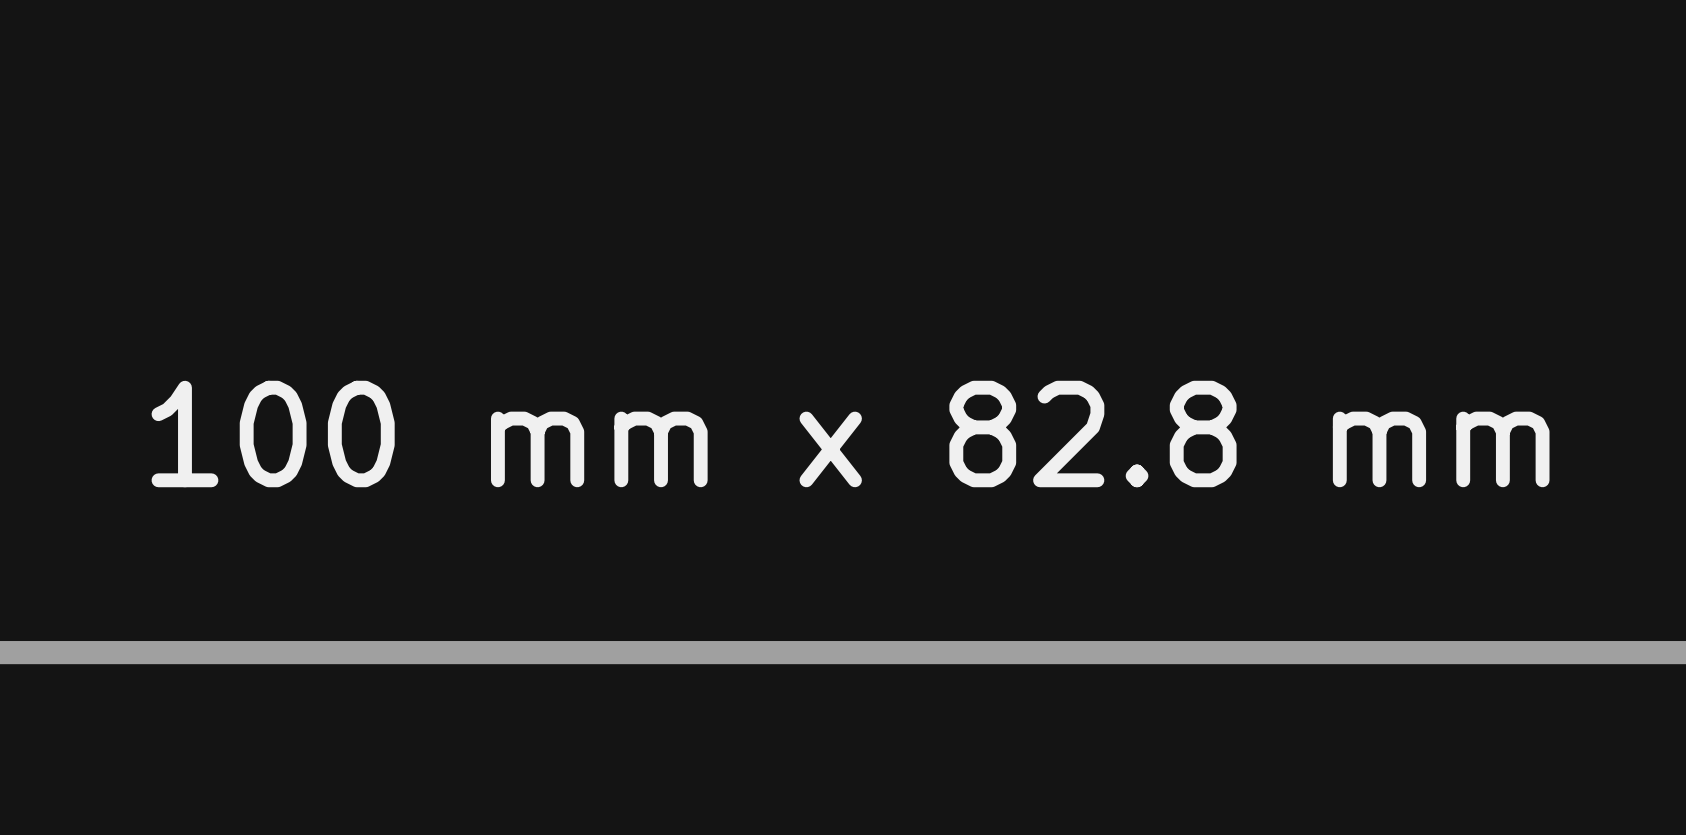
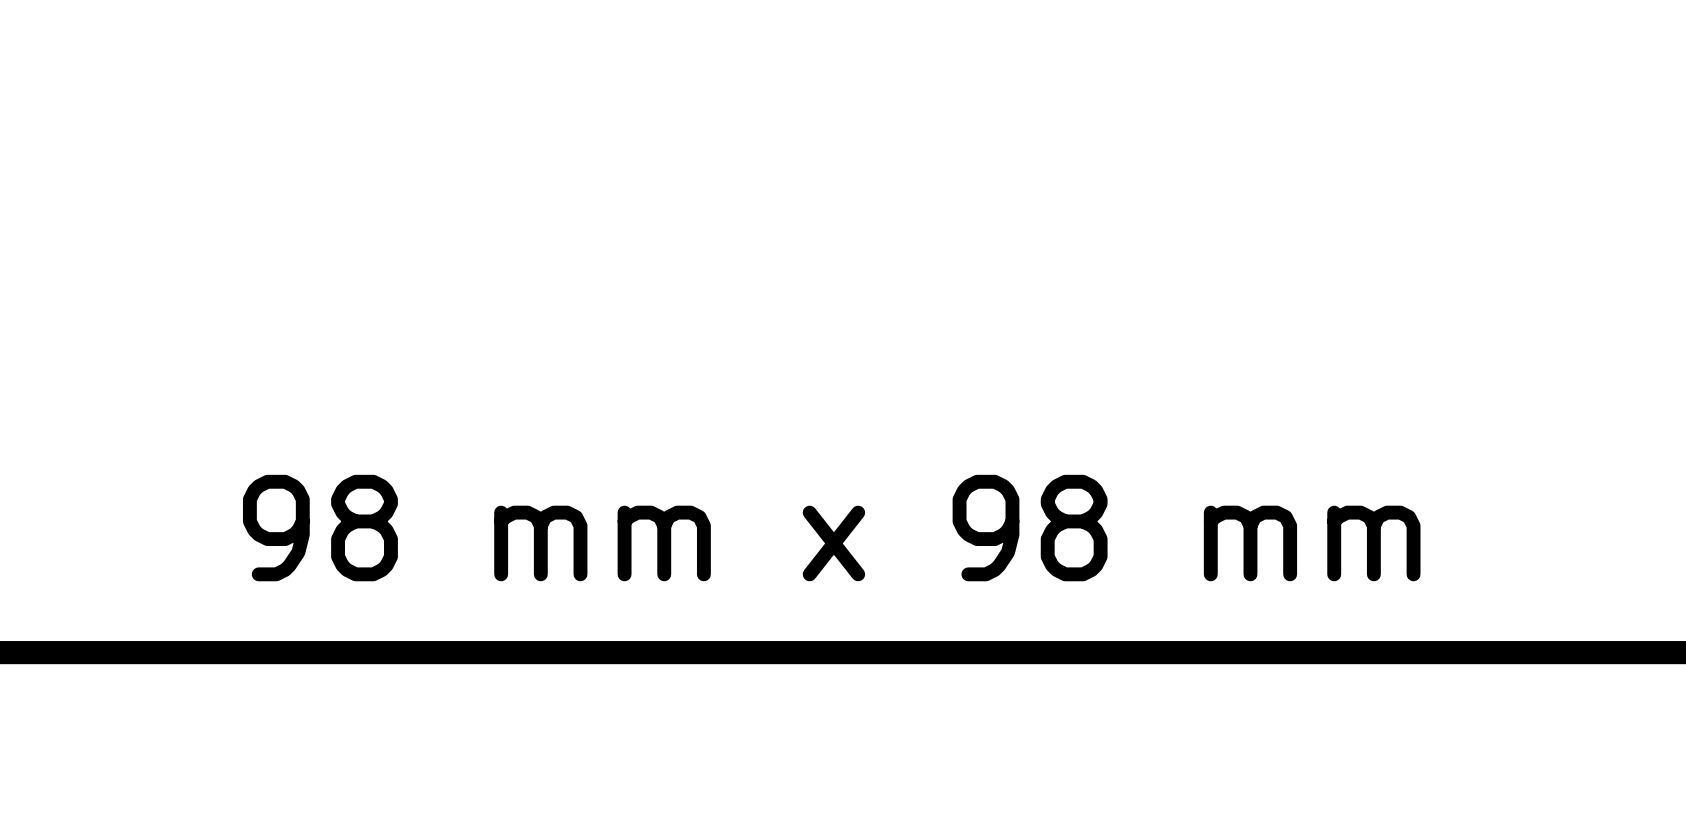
text: 100 mm x 82.8 mm (850, 434) -> 98 mm x 98 mm (831, 528)

